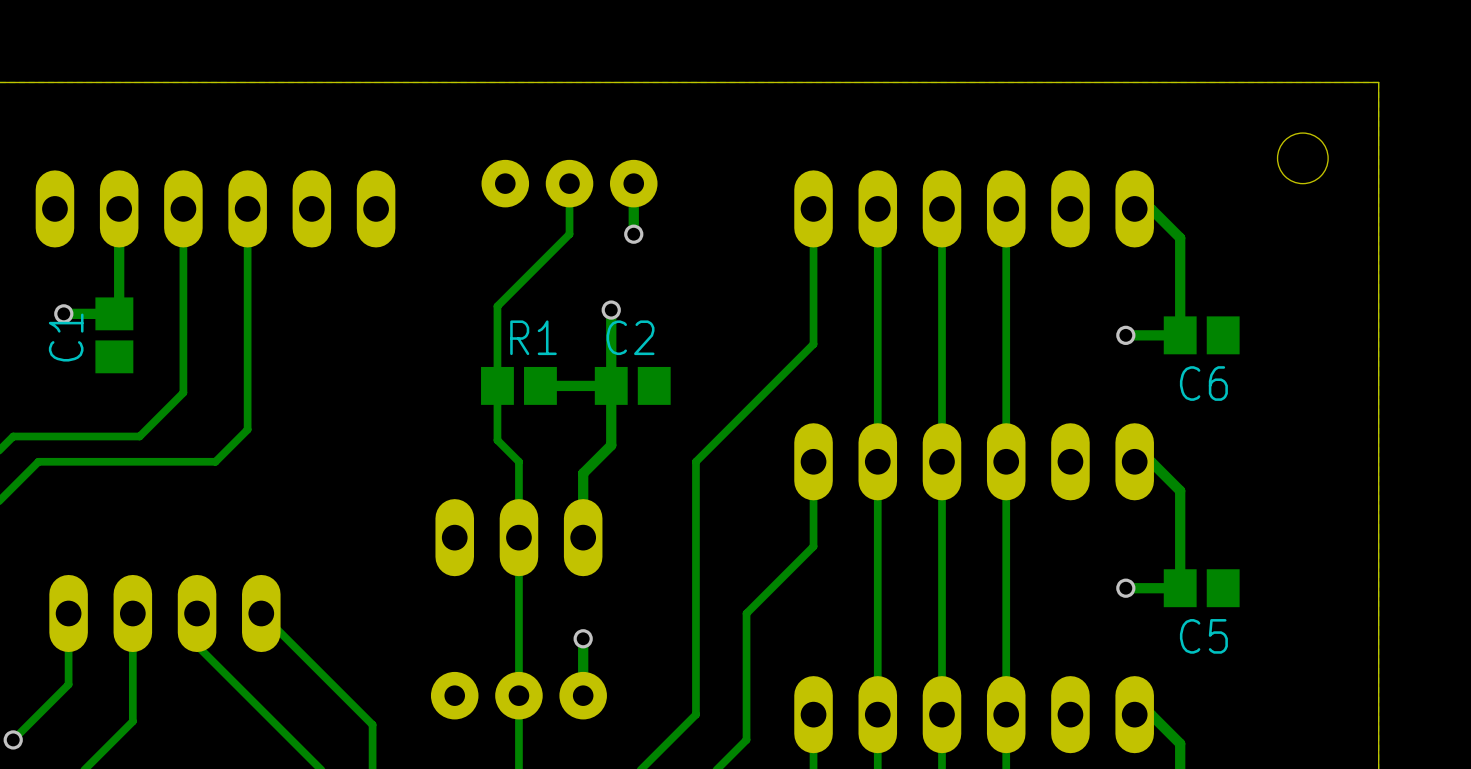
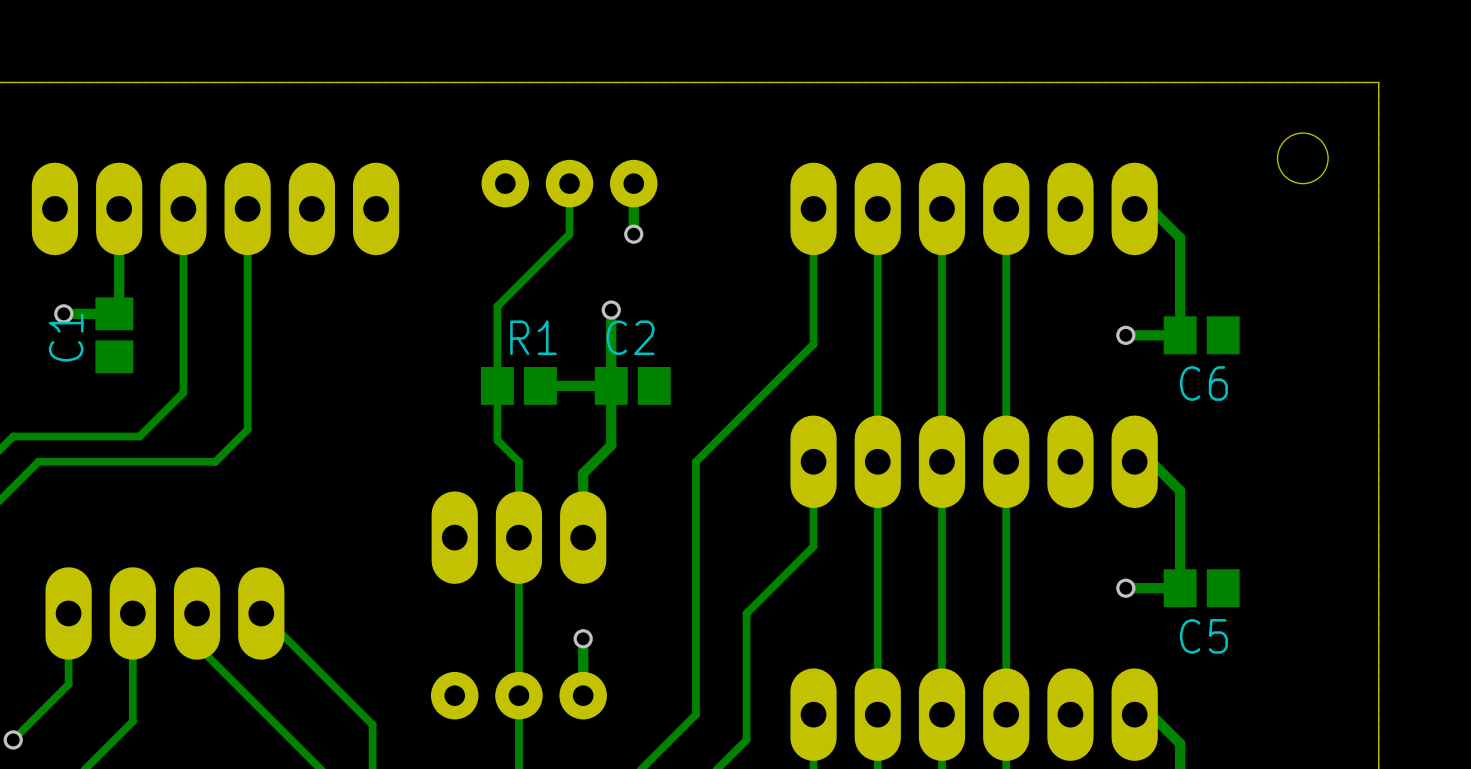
part footprint: [35, 170, 396, 248] -> [31, 162, 400, 256]
part footprint: [794, 170, 1154, 248] -> [790, 162, 1158, 256]
part footprint: [794, 423, 1154, 501] -> [790, 415, 1158, 509]
part footprint: [435, 499, 603, 577] -> [431, 491, 607, 584]
part footprint: [49, 574, 281, 653] -> [45, 567, 285, 660]
part footprint: [794, 676, 1154, 754] -> [790, 668, 1158, 761]

